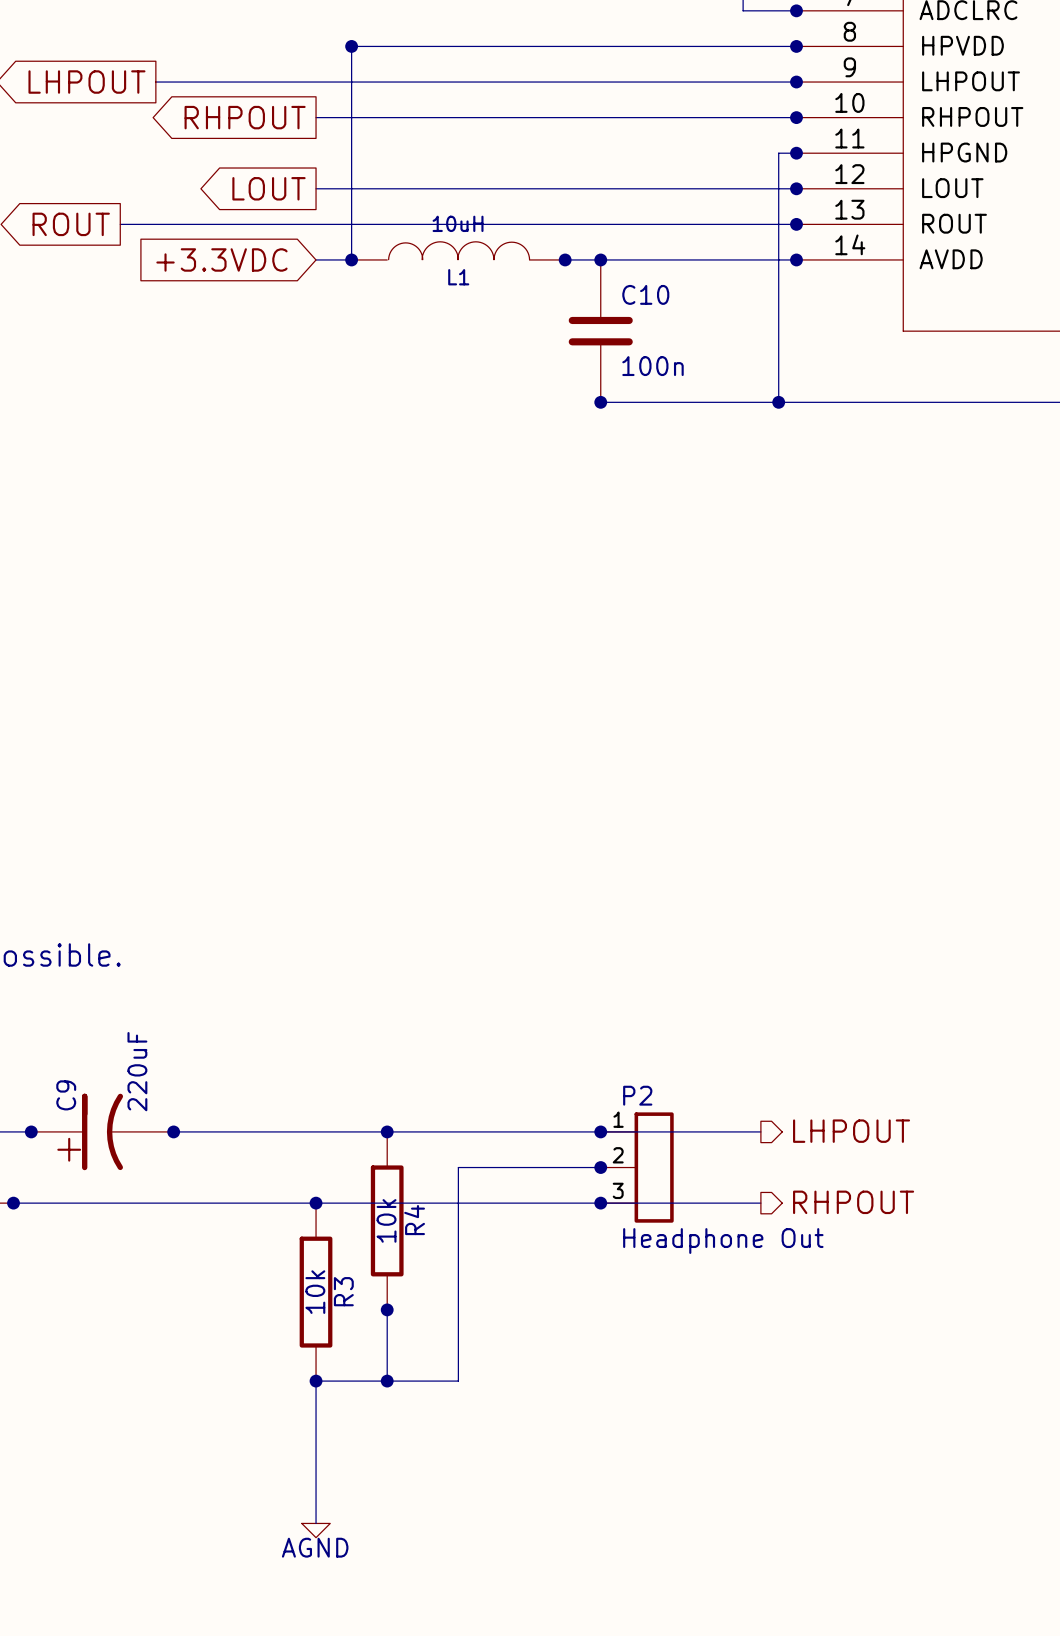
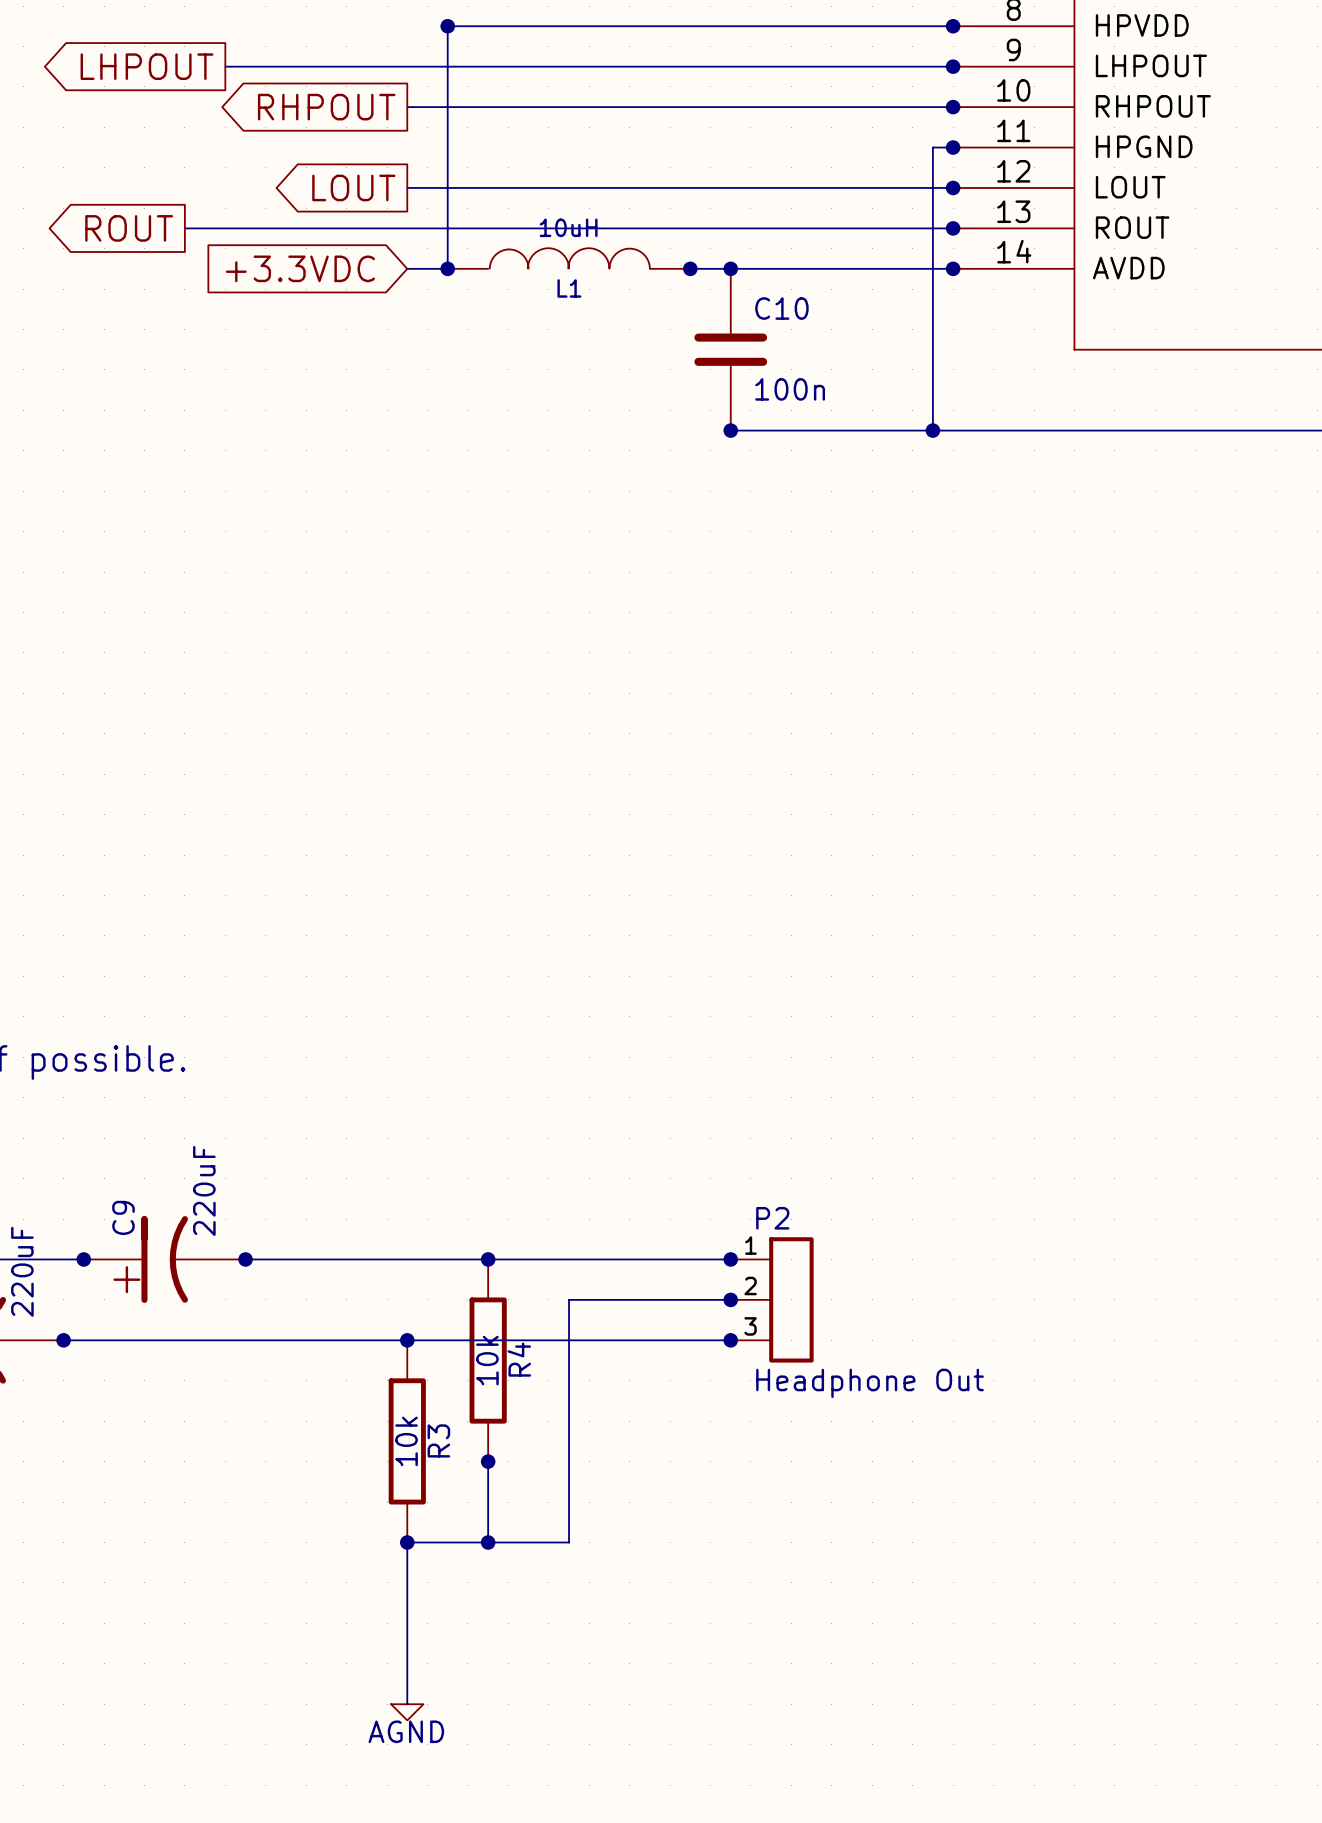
bus: (600, 1131) (760, 1131) -> none
hierarchical label: LHPOUT (851, 1131) -> none
hierarchical label: RHPOUT (853, 1202) -> none
bus: (600, 1203) (760, 1203) -> none

